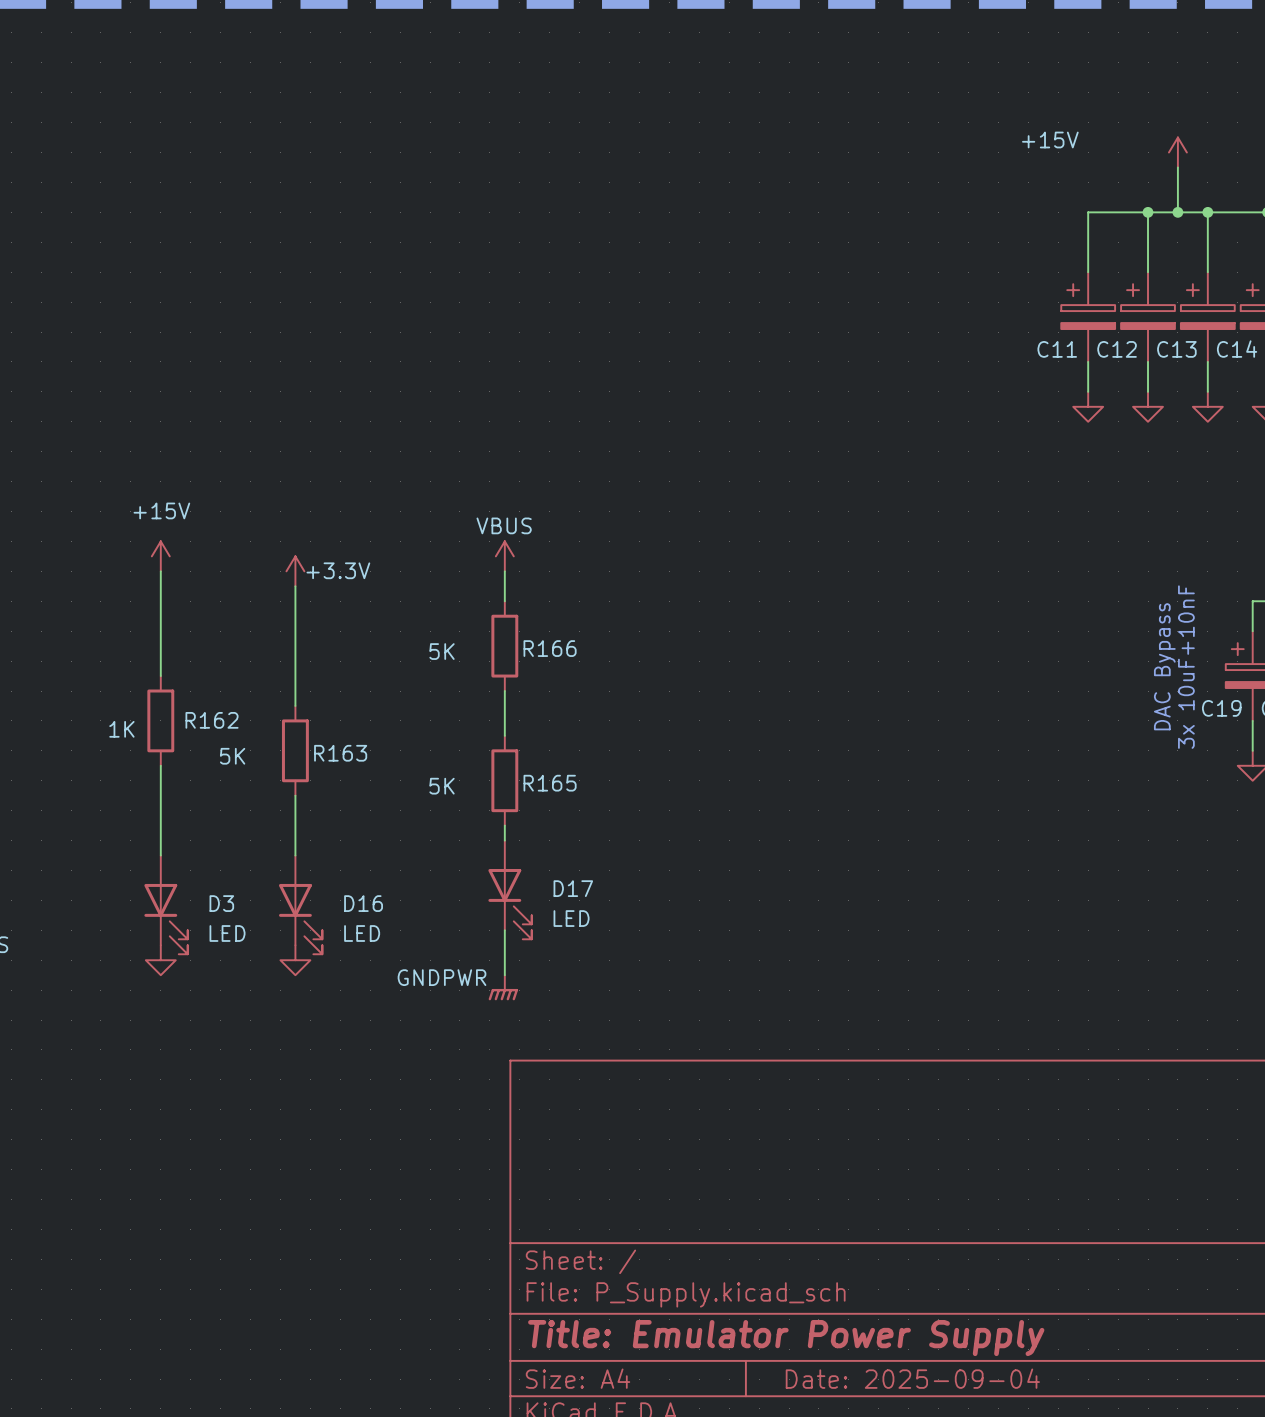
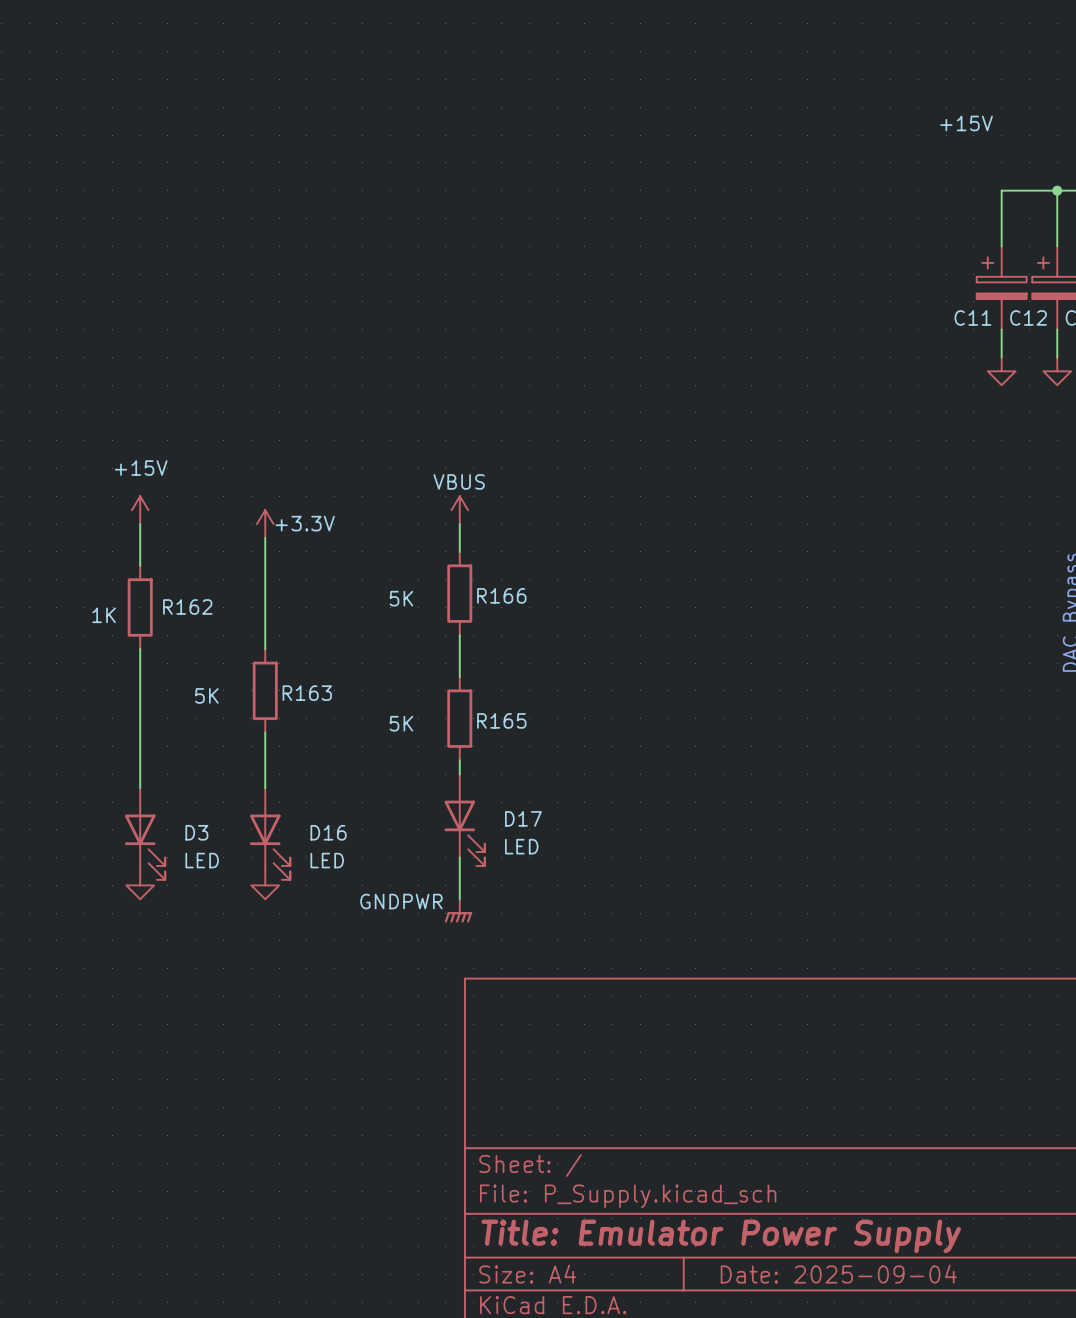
wire: (160, 616) (160, 676) -> (140, 649) (140, 704)
R162 position: (160, 720) -> (140, 607)

